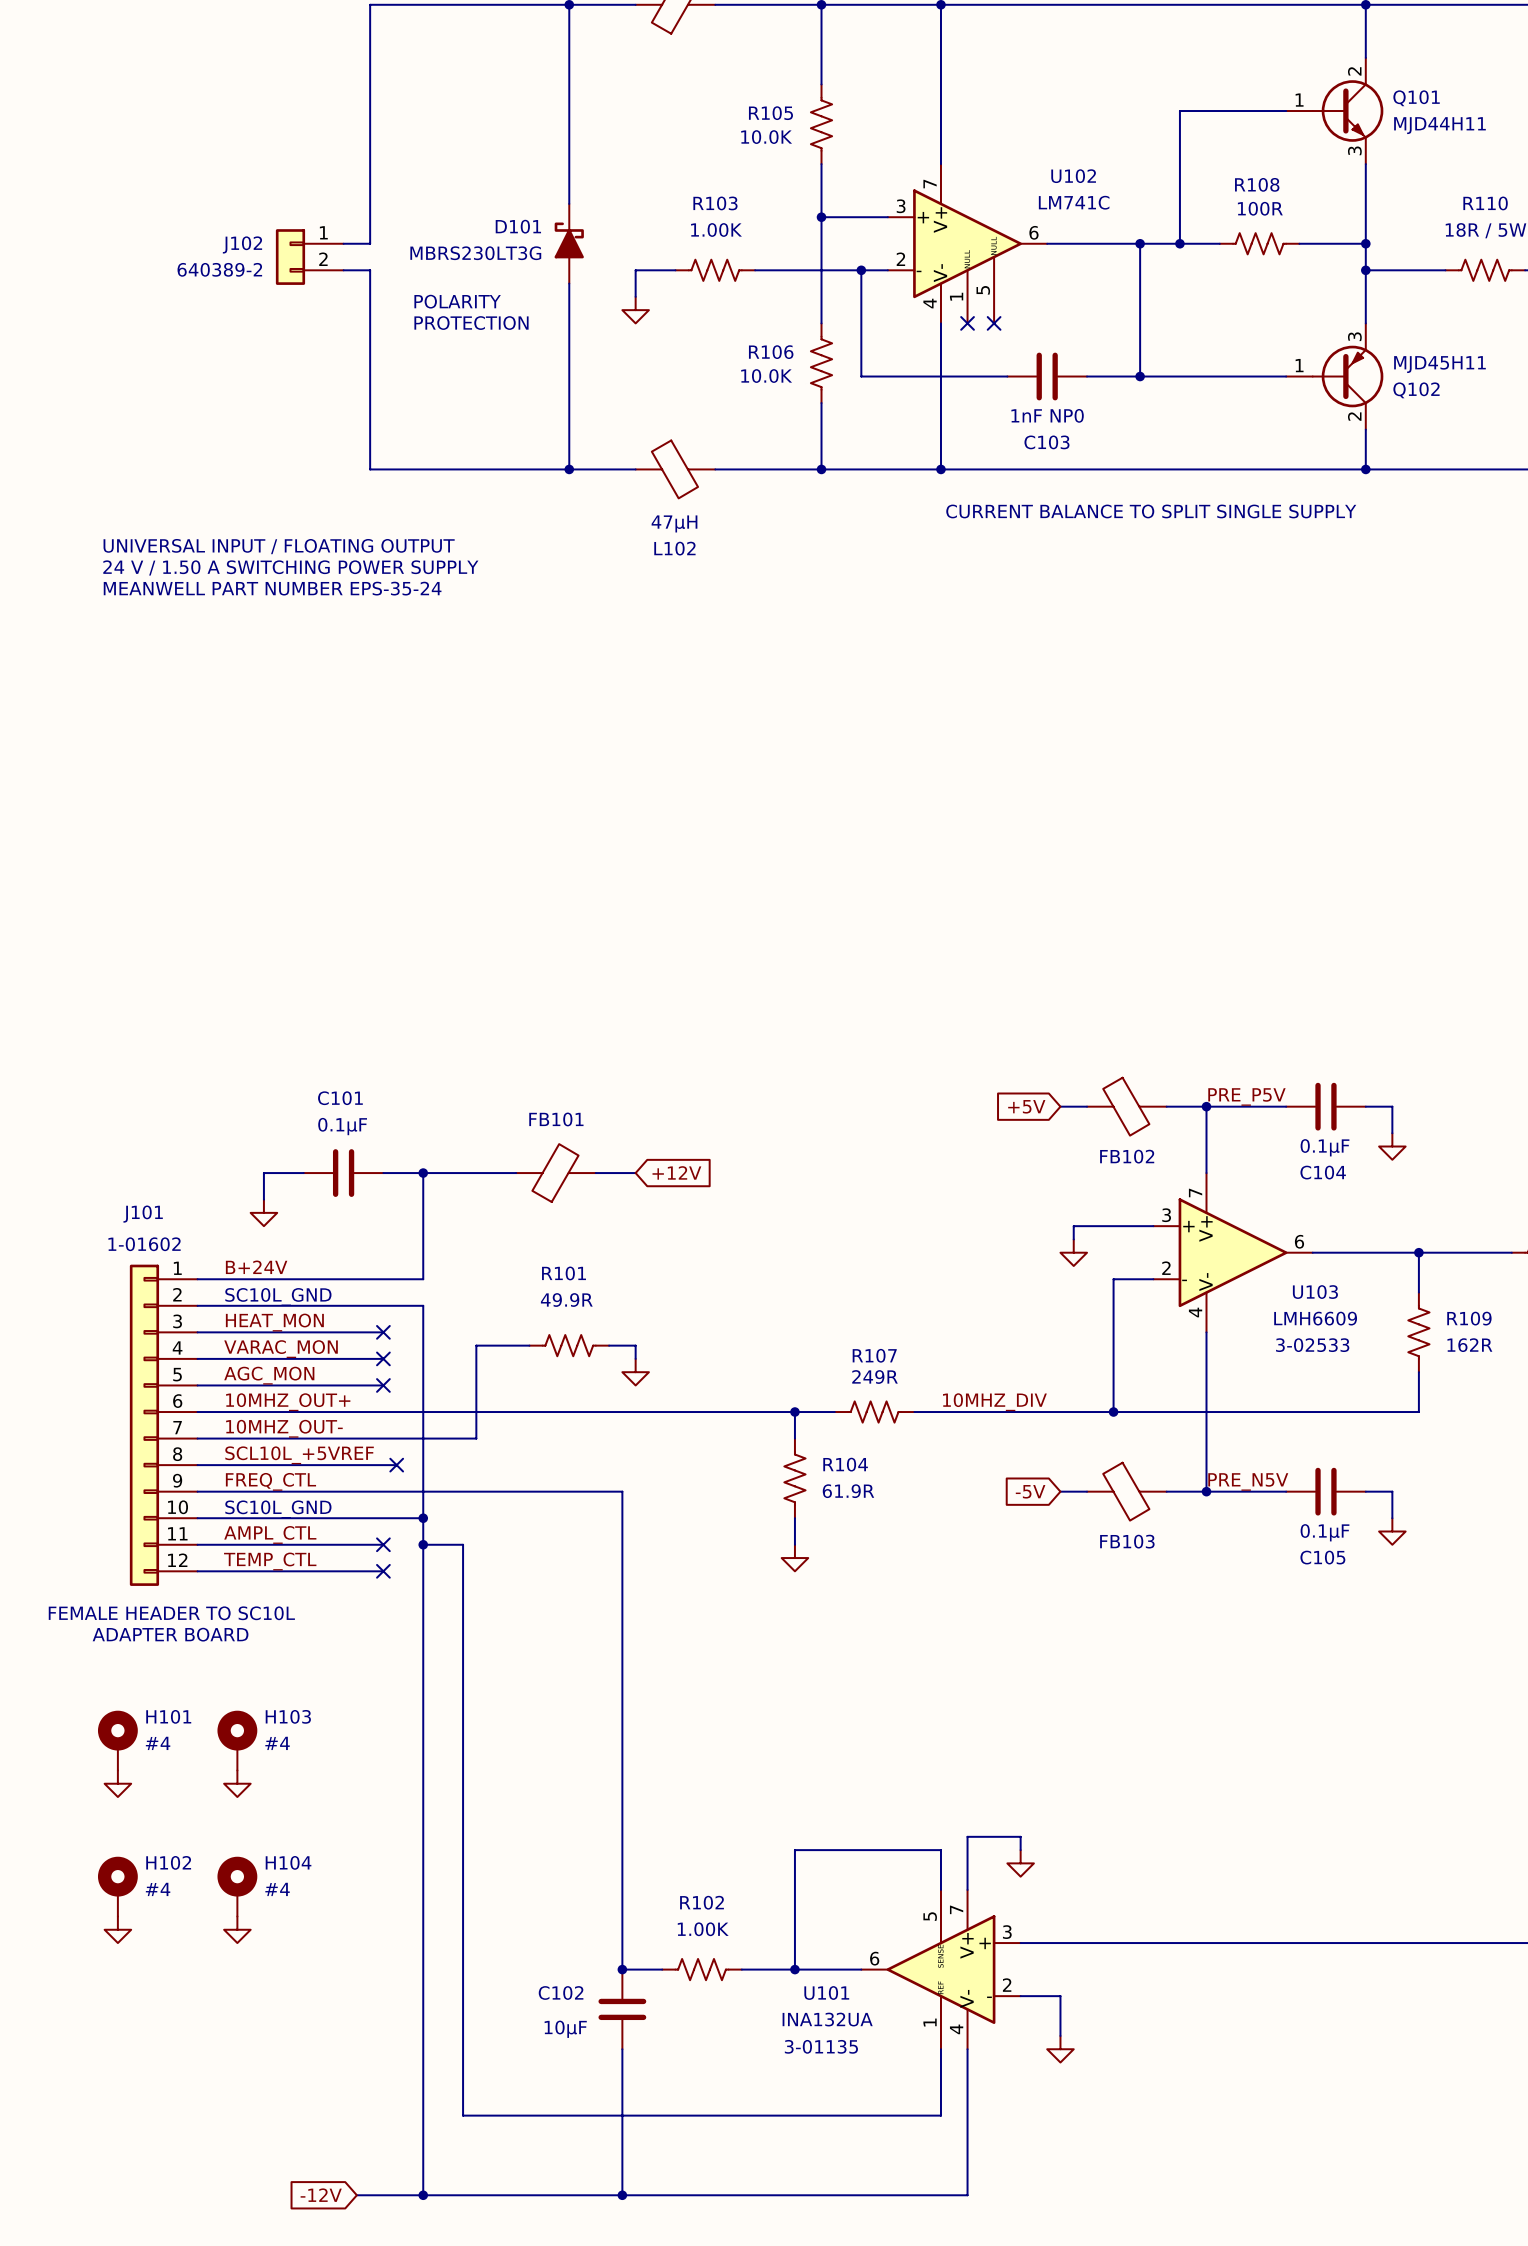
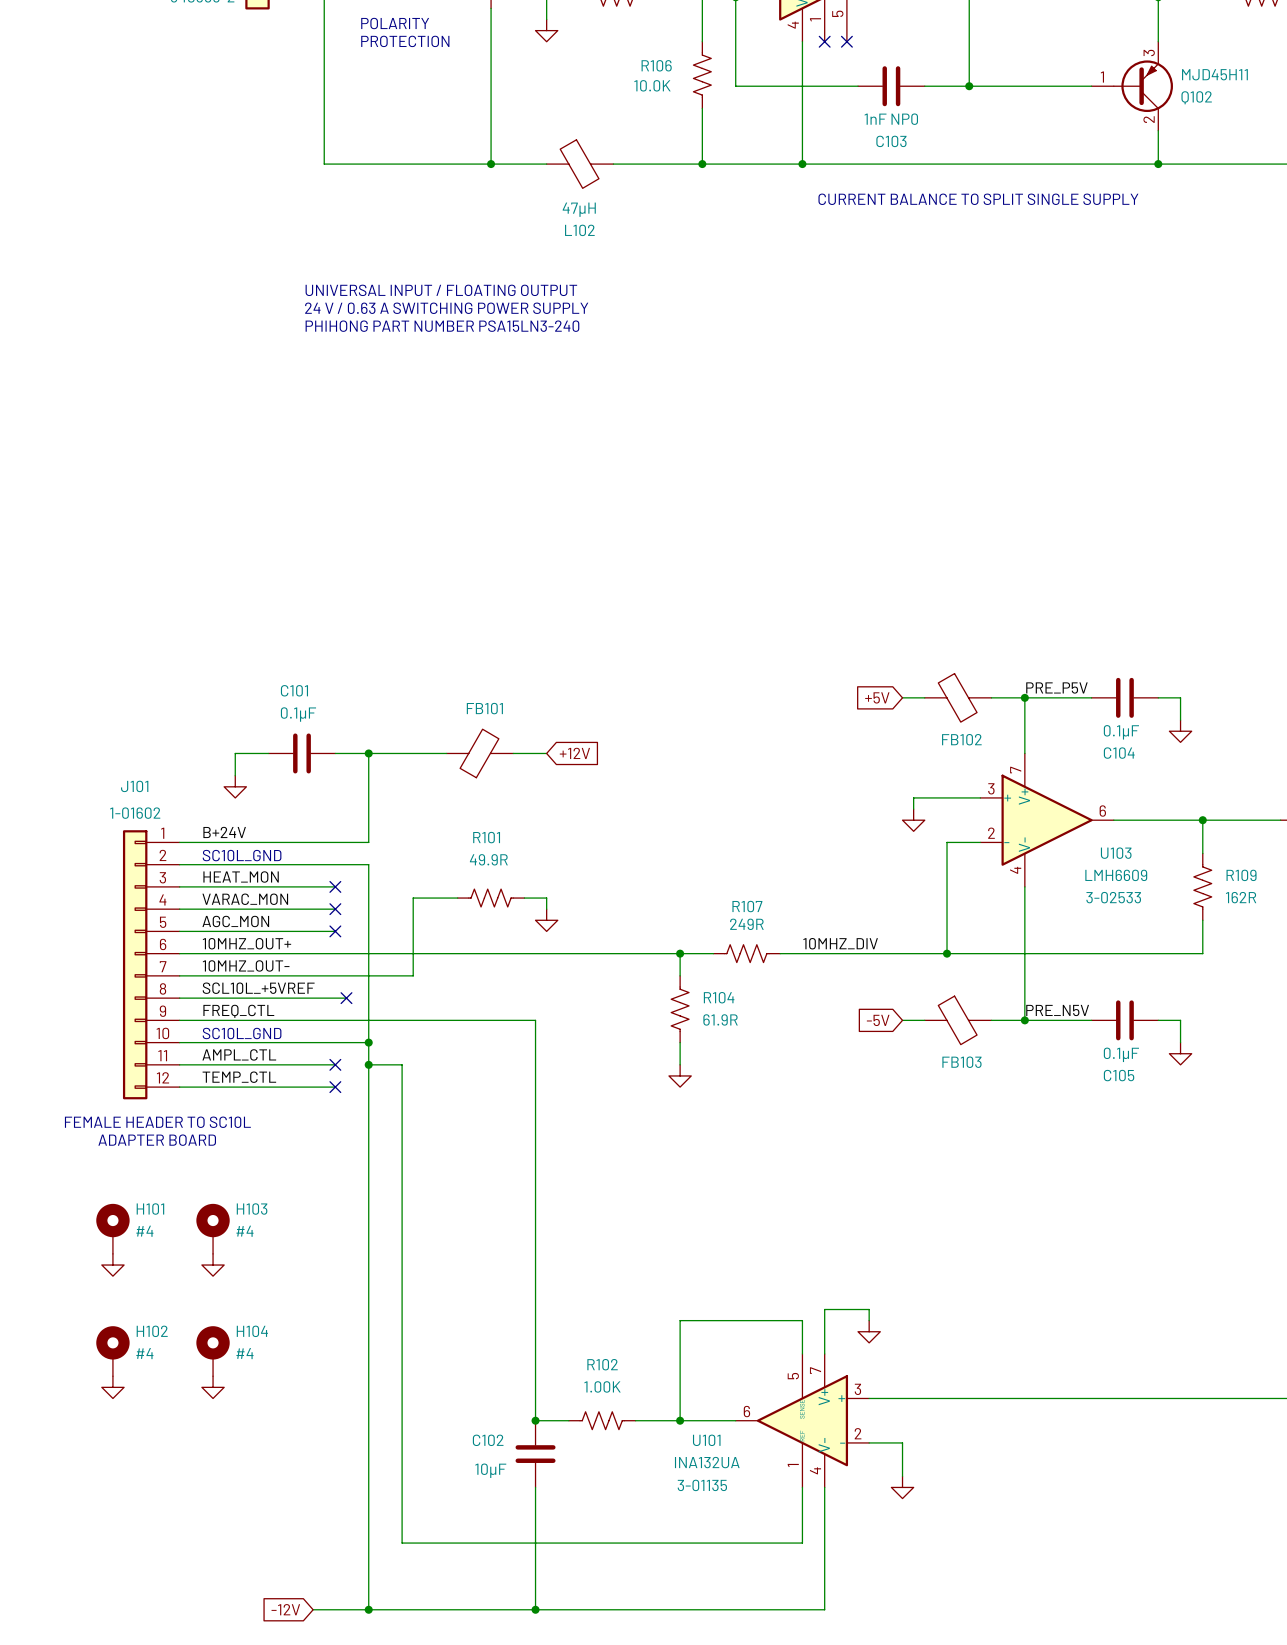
text position: UNIVERSAL INPUT / FLOATING OUTPUT (279, 546) -> UNIVERSAL INPUT / FLOATING OUTPUT (441, 290)
text: 24 V / 1.50 A SWITCHING POWER SUPPLY (290, 567) -> none
text: MEANWELL PART NUMBER EPS-35-24 (272, 588) -> none
text: none -> 24 V / 0.63 A SWITCHING POWER SUPPLY (446, 308)
text: none -> PHIHONG PART NUMBER PSA15LN3-240 (442, 326)

